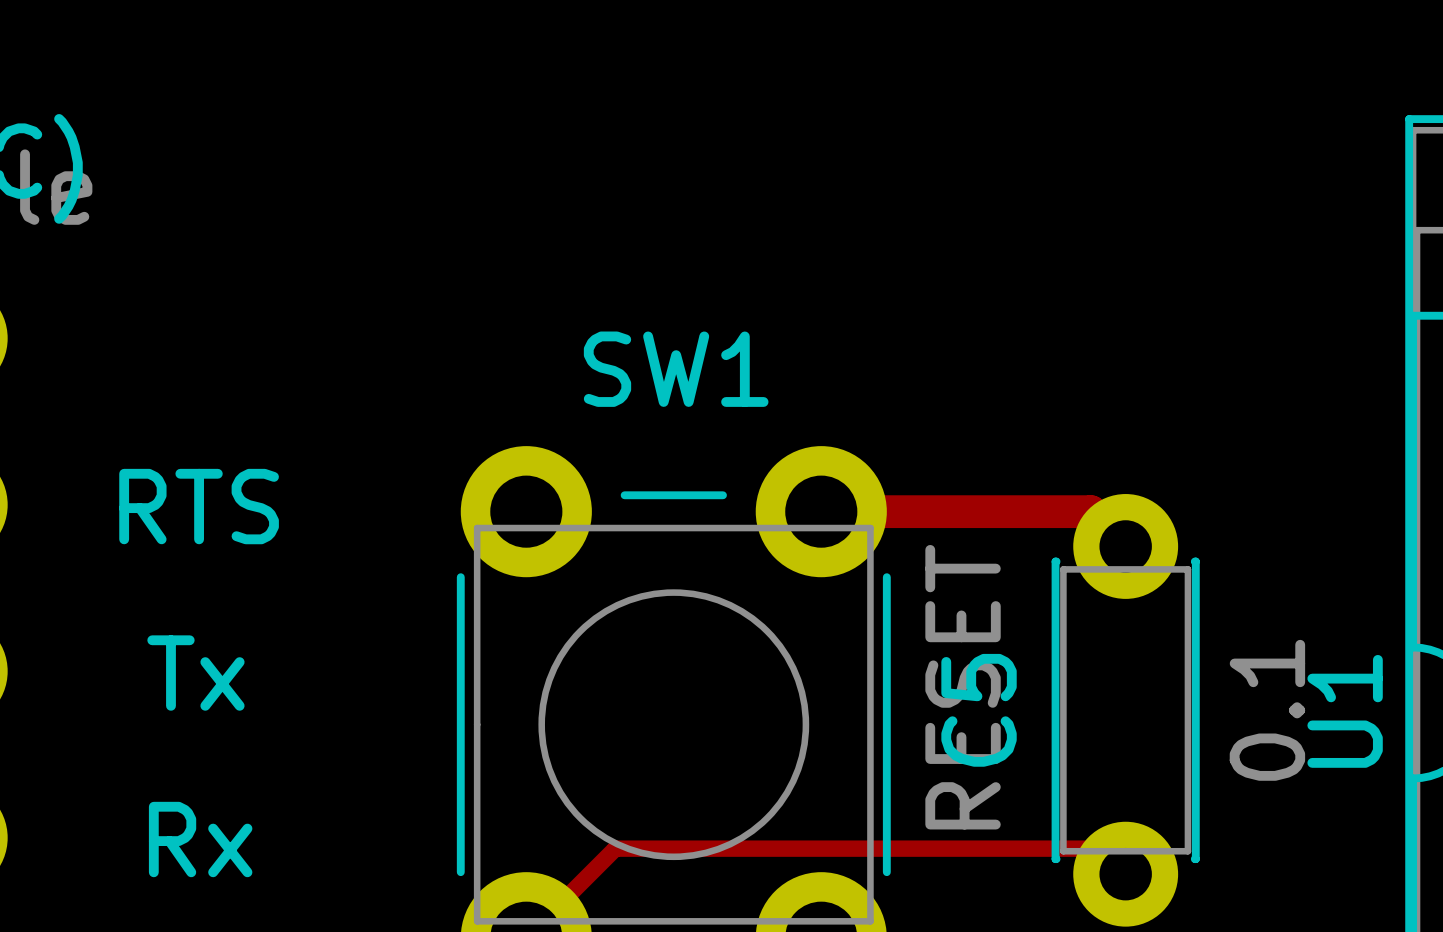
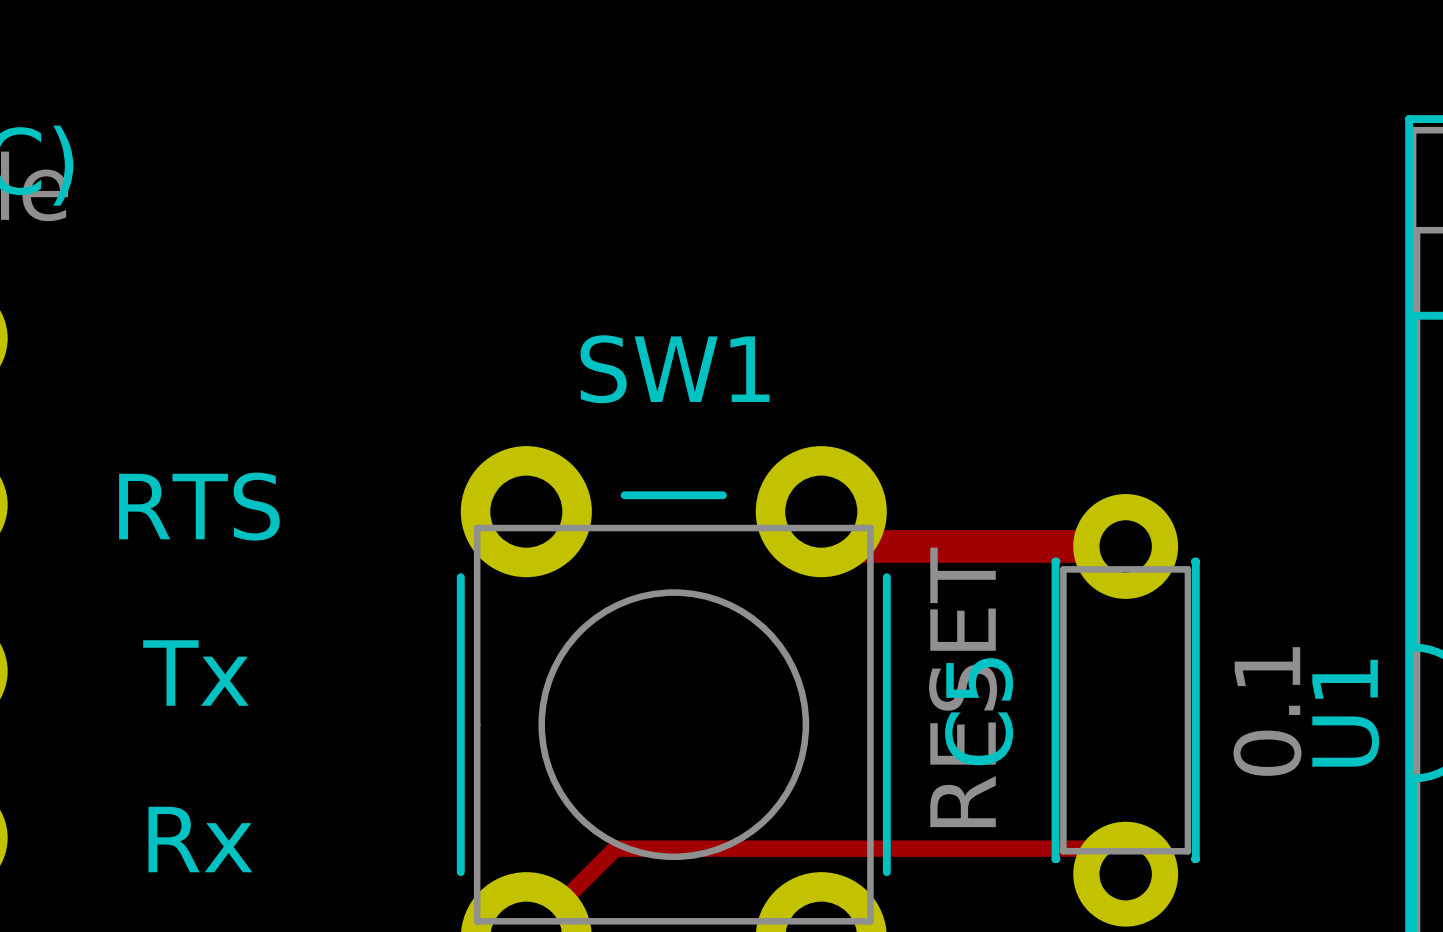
track: (821, 511) (1090, 511) (1125, 546) -> (821, 511) (856, 546) (1125, 546)

